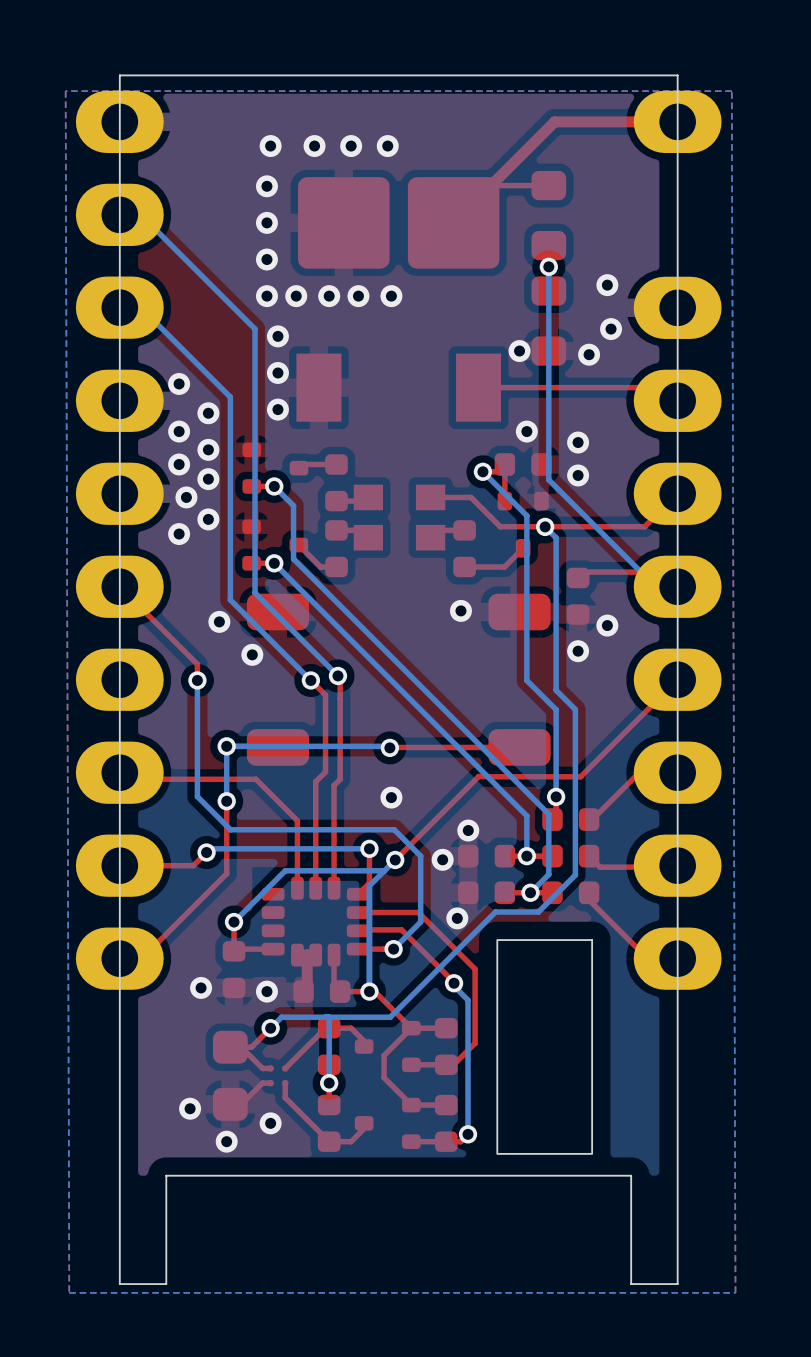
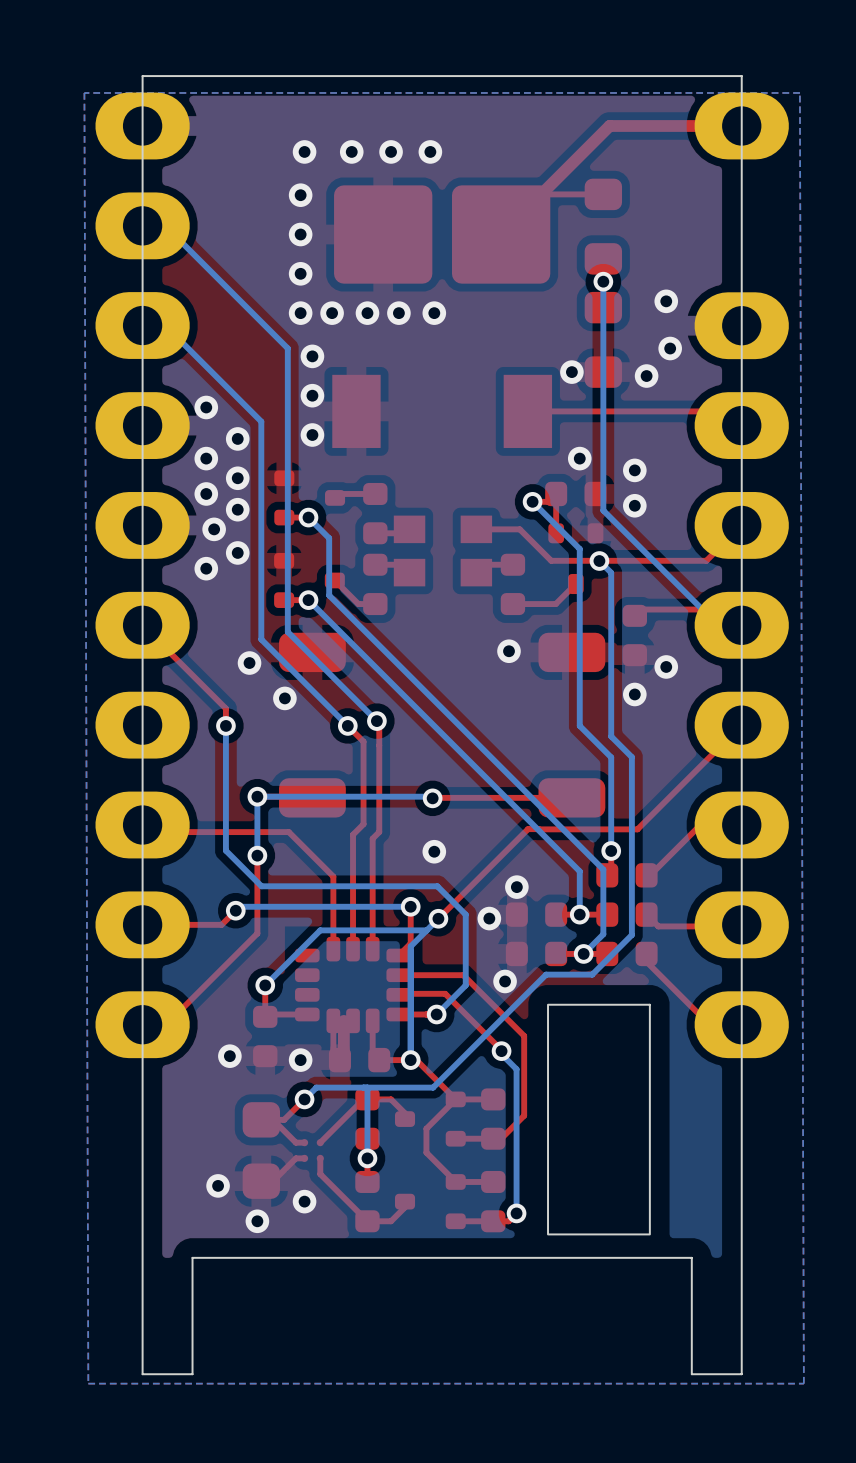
top track: none -> (333, 1020) (333, 1053)

